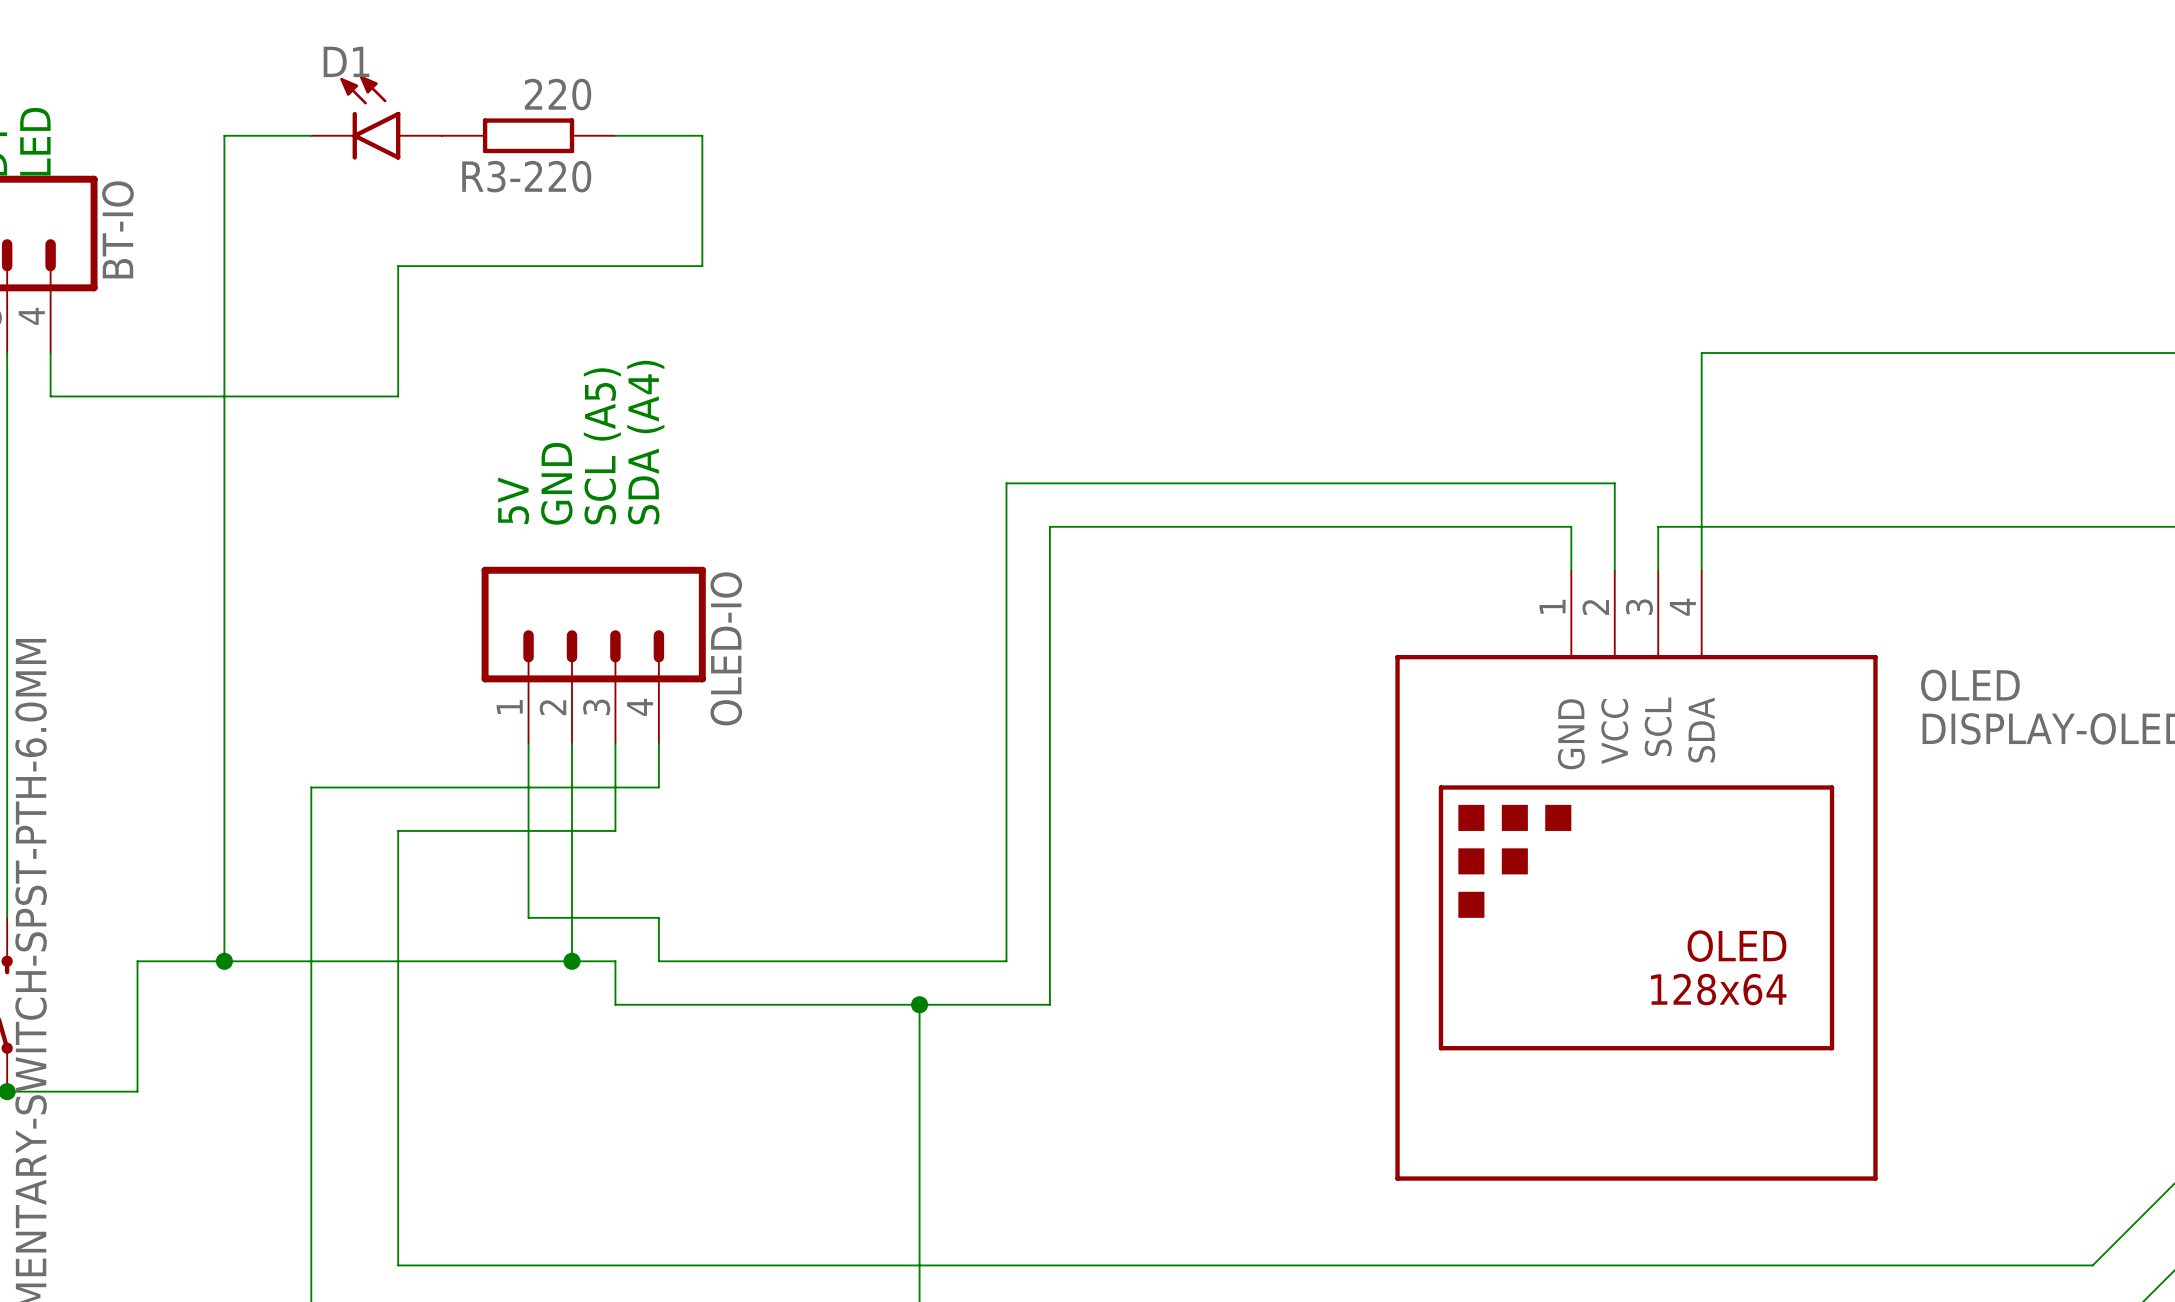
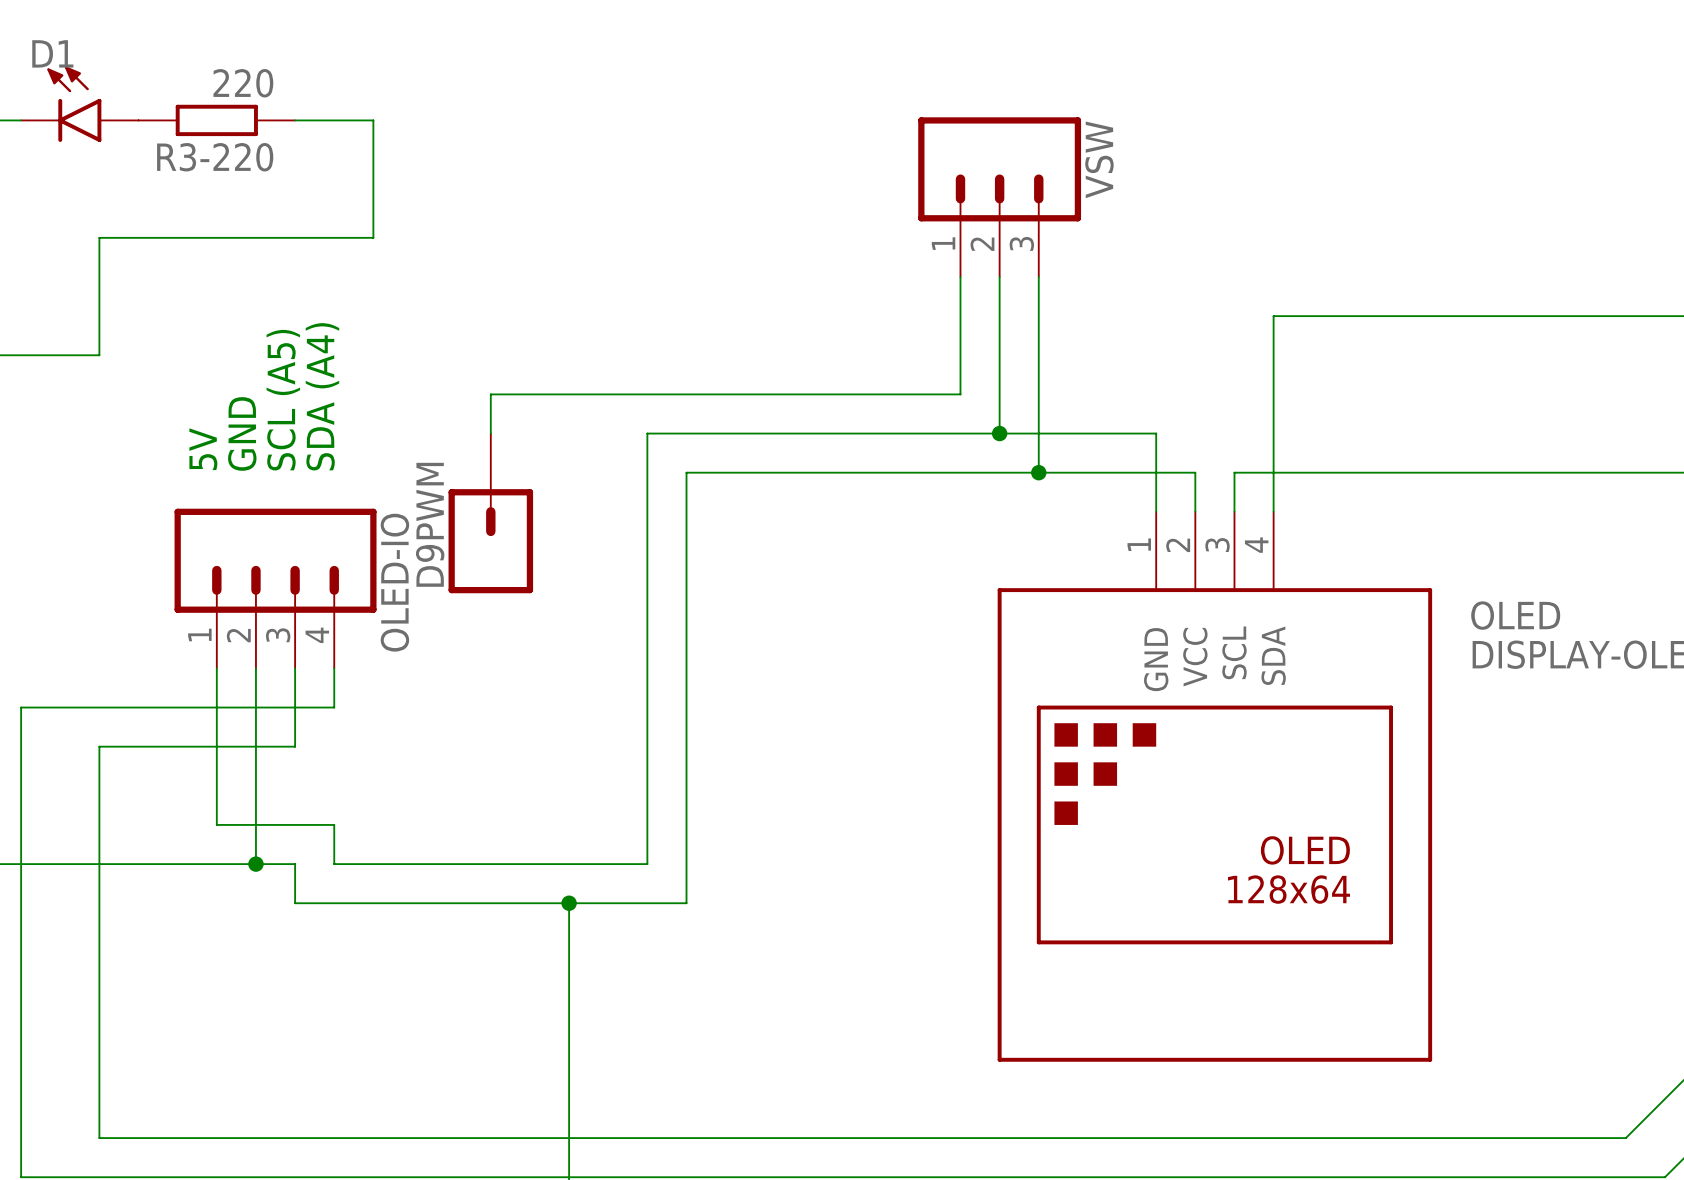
VSW: none -> (999, 197)
wire: none -> (960, 276) (960, 394) (490, 394) (490, 433)
wire: none -> (999, 276) (999, 433)
wire: none -> (1038, 276) (1038, 472)
junction: none -> (999, 433)
wire: (1571, 483) (1614, 483) (1614, 526) -> (1156, 433) (1156, 472) (1195, 472)
junction: none -> (1038, 472)
D9PWM: none -> (490, 513)

